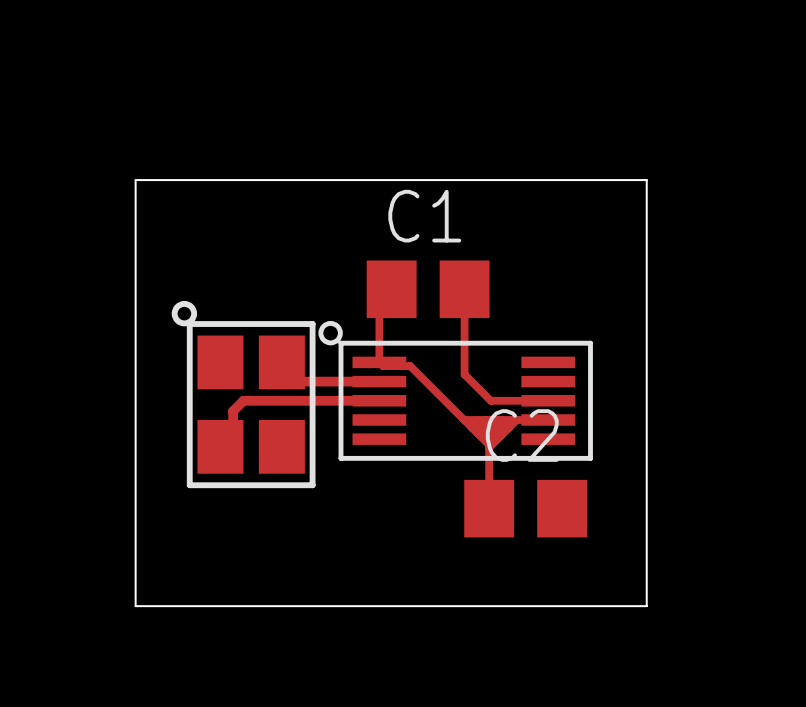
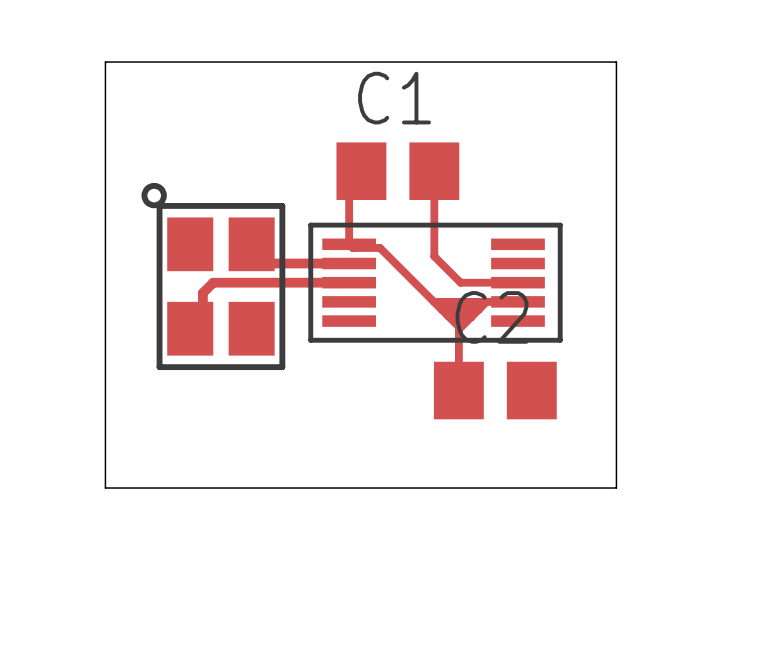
part footprint: [318, 320, 593, 461] -> [308, 222, 563, 343]

